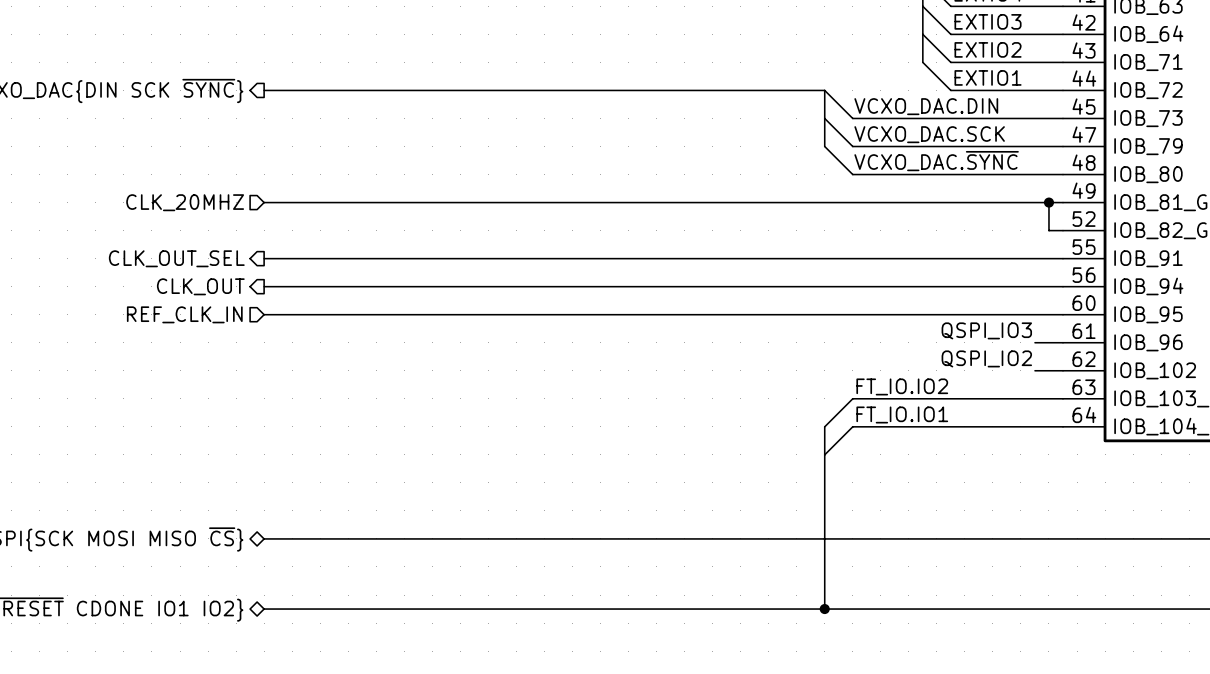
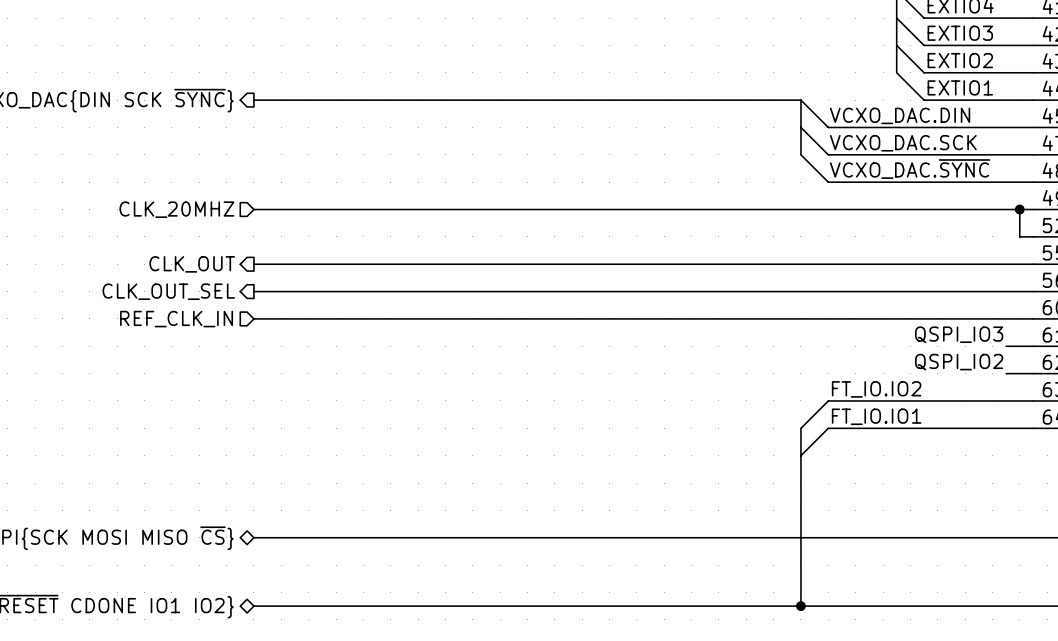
hierarchical label: CLK_OUT_SEL (176, 258) -> CLK_OUT (192, 264)
hierarchical label: CLK_OUT (200, 286) -> CLK_OUT_SEL (168, 291)

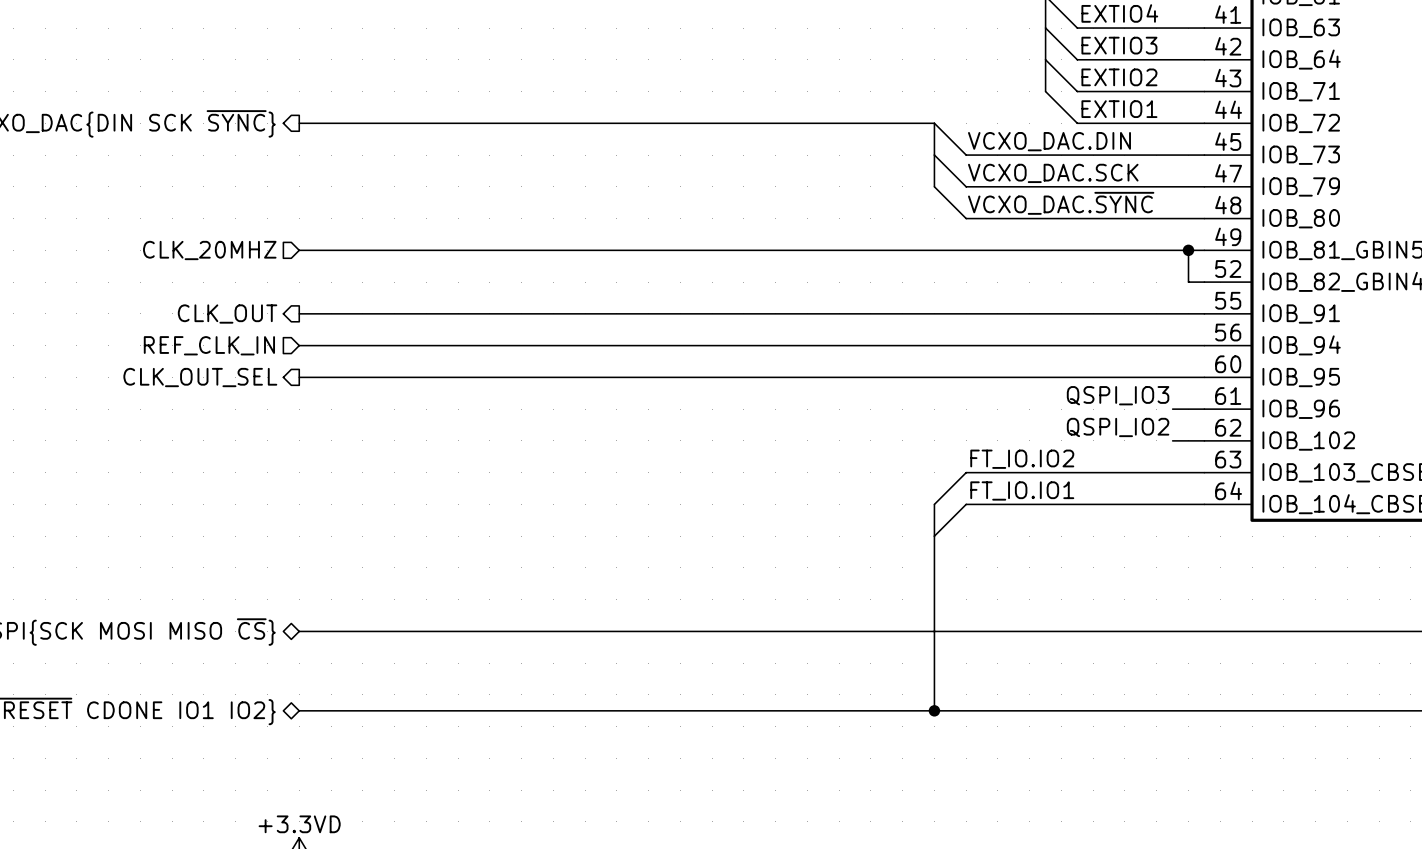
hierarchical label shape: output (168, 291) -> input (209, 345)
hierarchical label: CLK_OUT_SEL (168, 291) -> REF_CLK_IN (209, 345)
hierarchical label shape: input (176, 319) -> output (200, 377)
hierarchical label: REF_CLK_IN (176, 319) -> CLK_OUT_SEL (200, 377)

